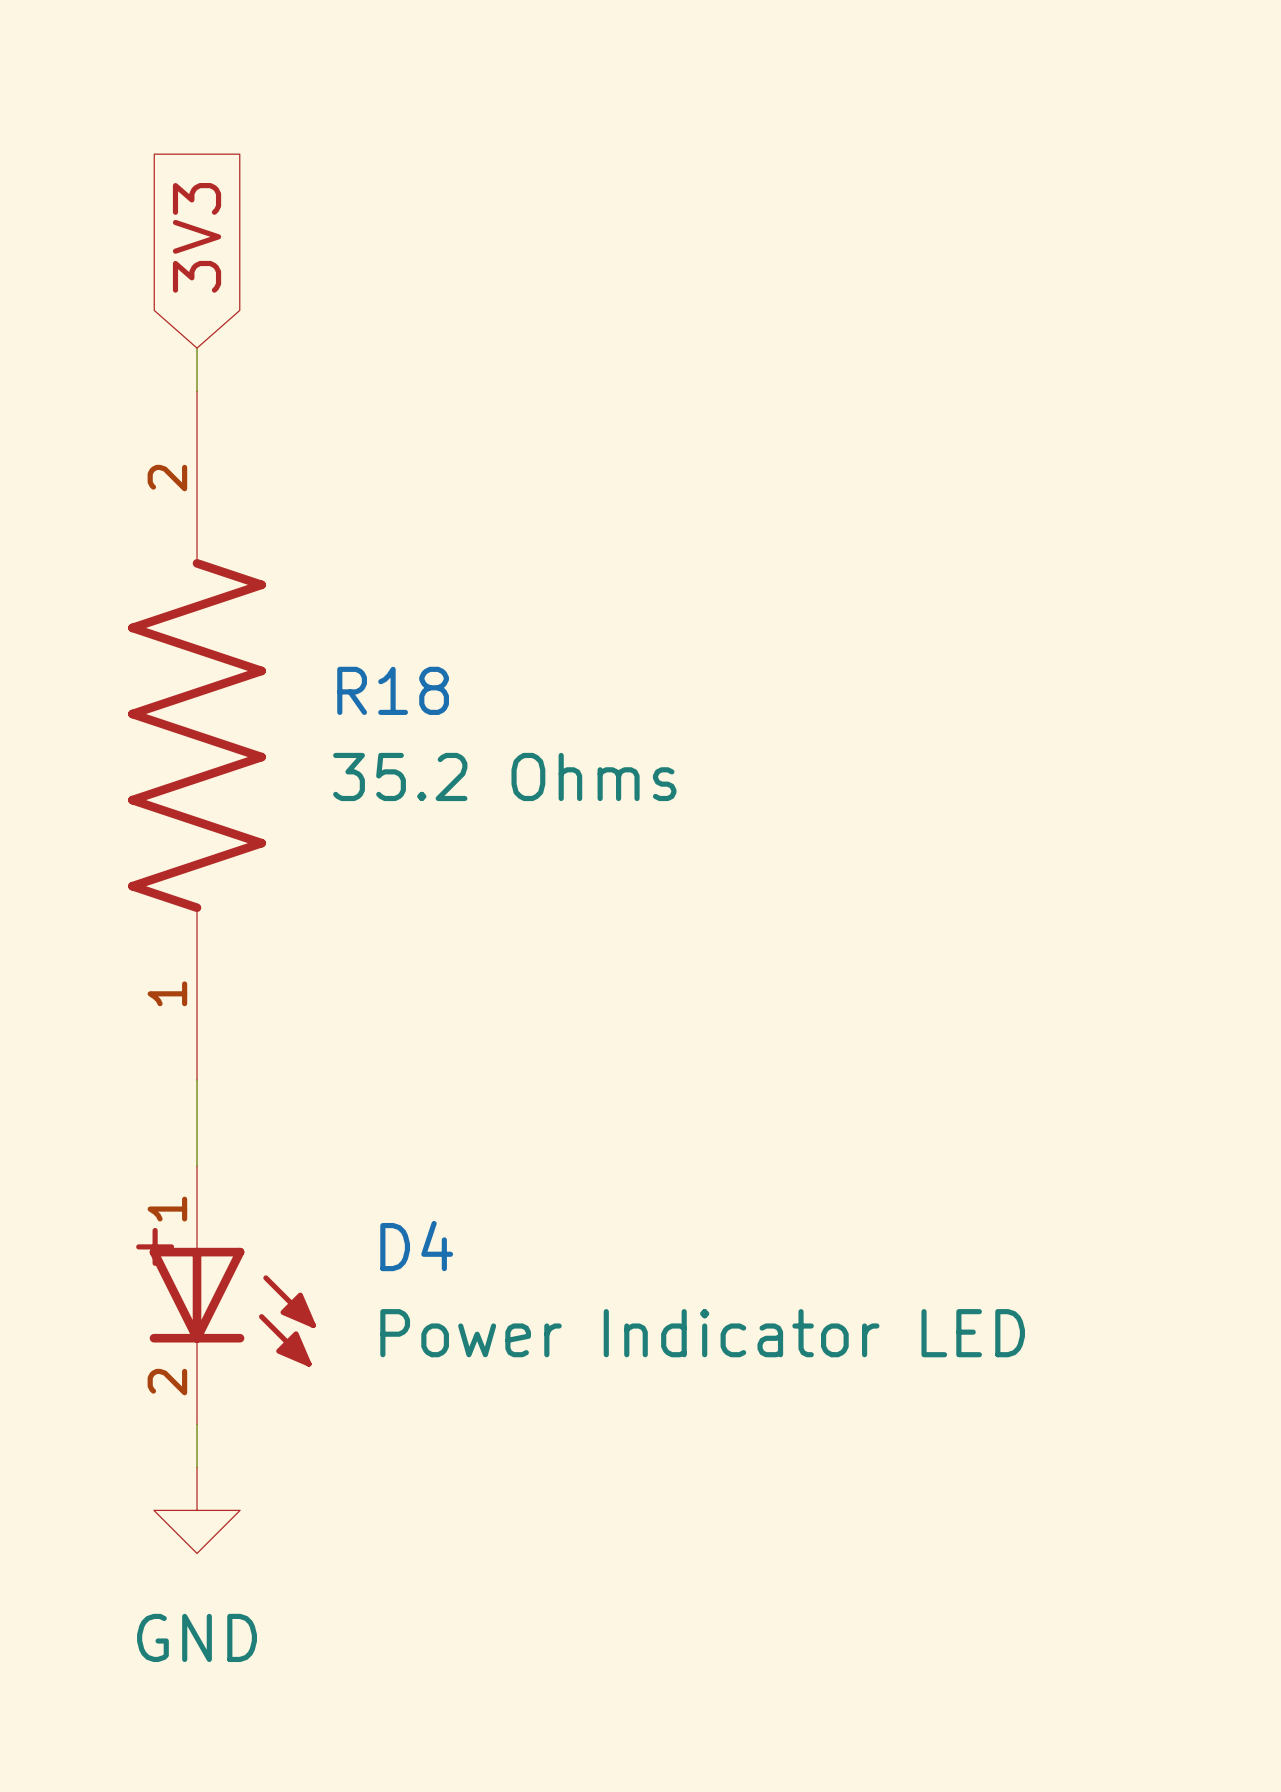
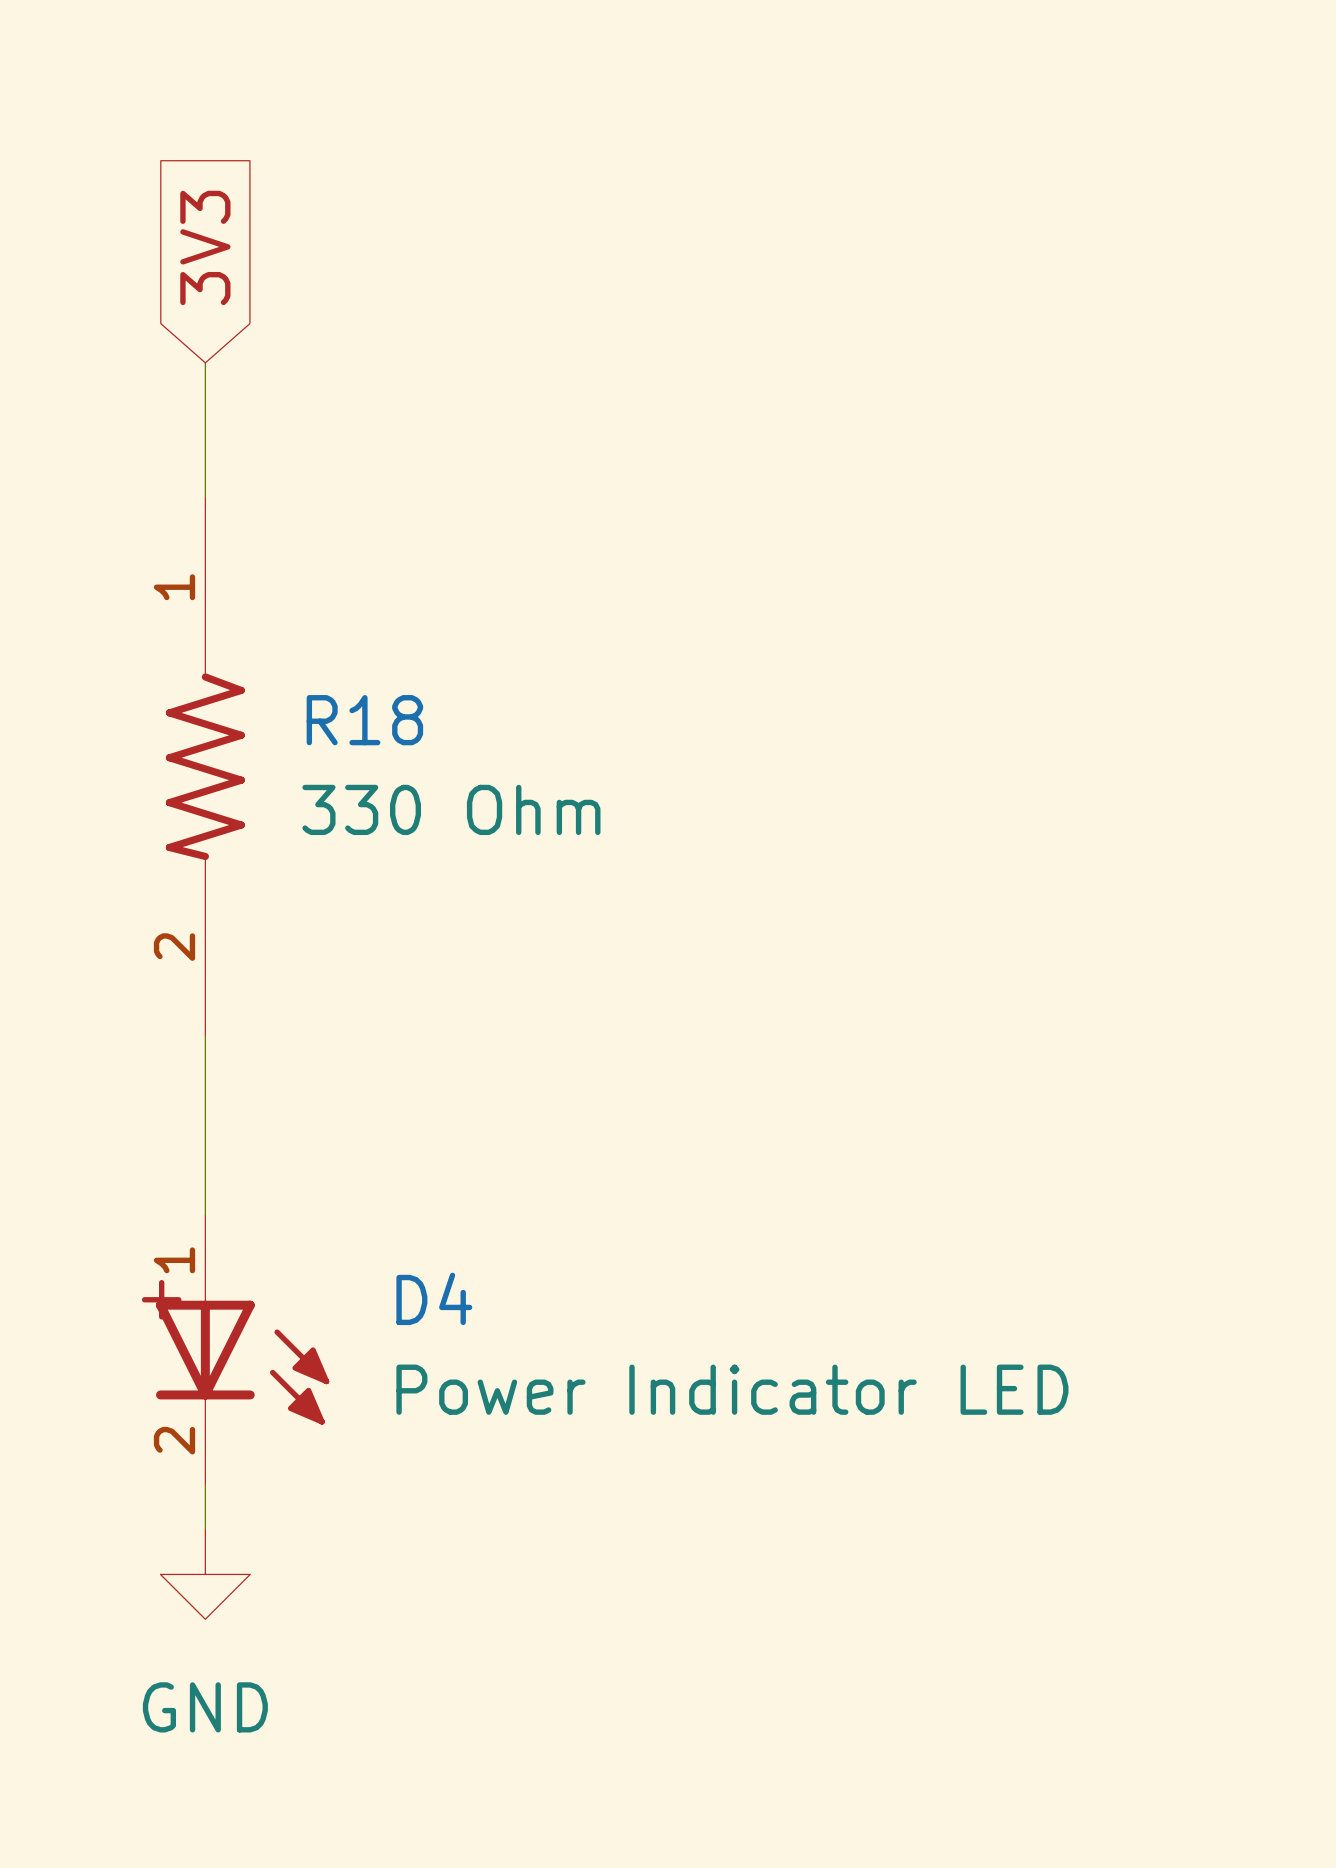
R18 symbol: [128, 391, 266, 1080] -> [165, 497, 245, 1036]
R18 value: 35.2 Ohms (504, 776) -> 330 Ohm (451, 809)

